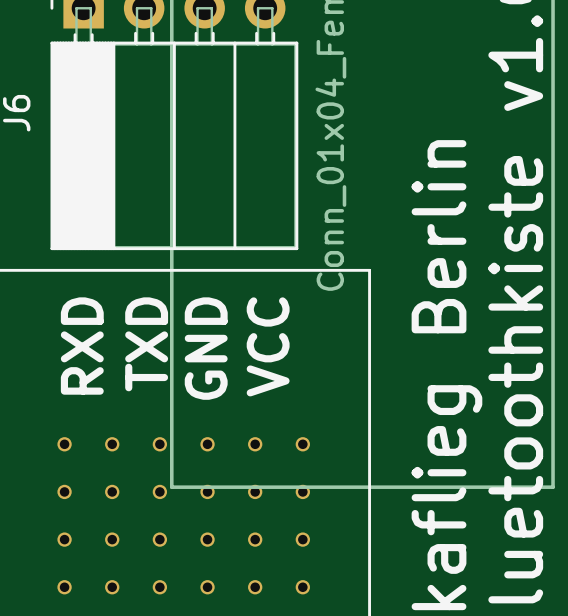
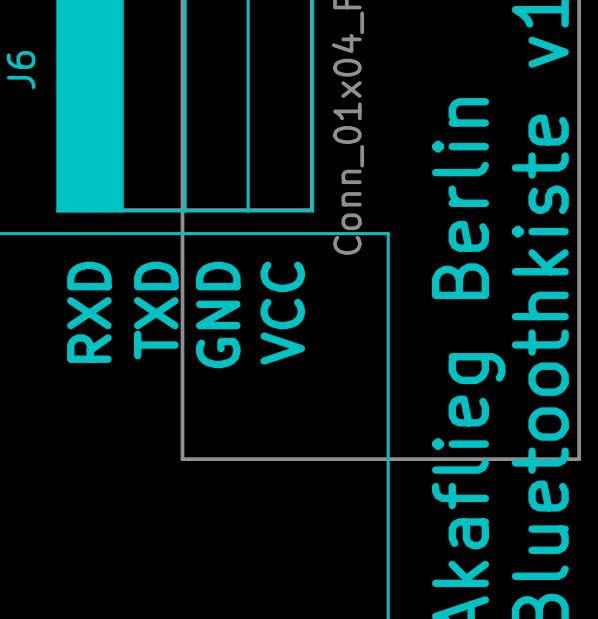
part: (64, 444) -> none
part: (112, 444) -> none
part: (159, 444) -> none
part: (207, 444) -> none
part: (255, 444) -> none
part: (302, 444) -> none
part: (64, 491) -> none
part: (112, 491) -> none
part: (159, 491) -> none
part: (207, 491) -> none
part: (255, 491) -> none
part: (302, 491) -> none
part: (64, 539) -> none
part: (112, 539) -> none
part: (159, 539) -> none
part: (207, 539) -> none
part: (255, 539) -> none
part: (302, 539) -> none
part: (64, 587) -> none
part: (112, 587) -> none
part: (159, 587) -> none
part: (207, 587) -> none
part: (255, 587) -> none
part: (302, 587) -> none

